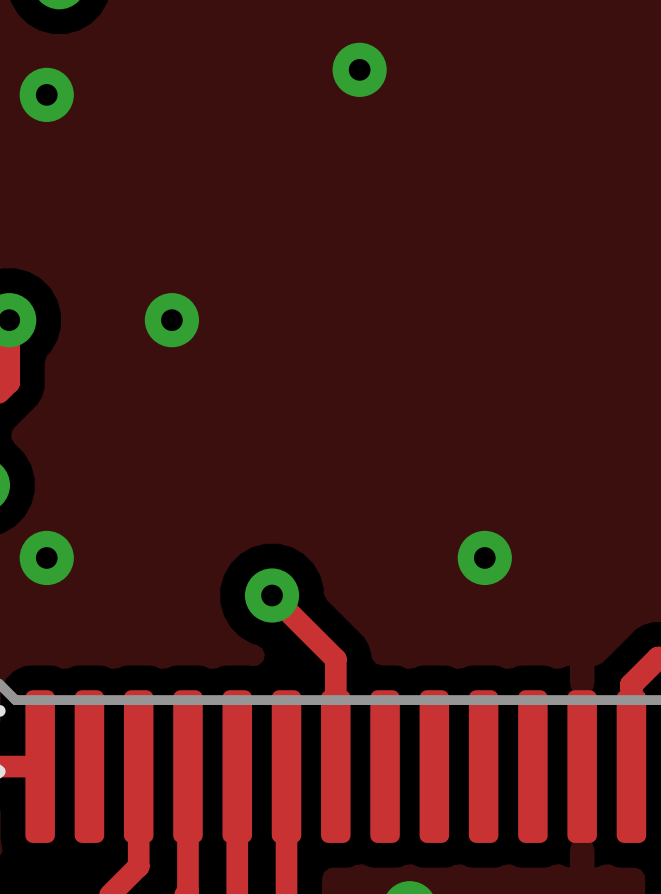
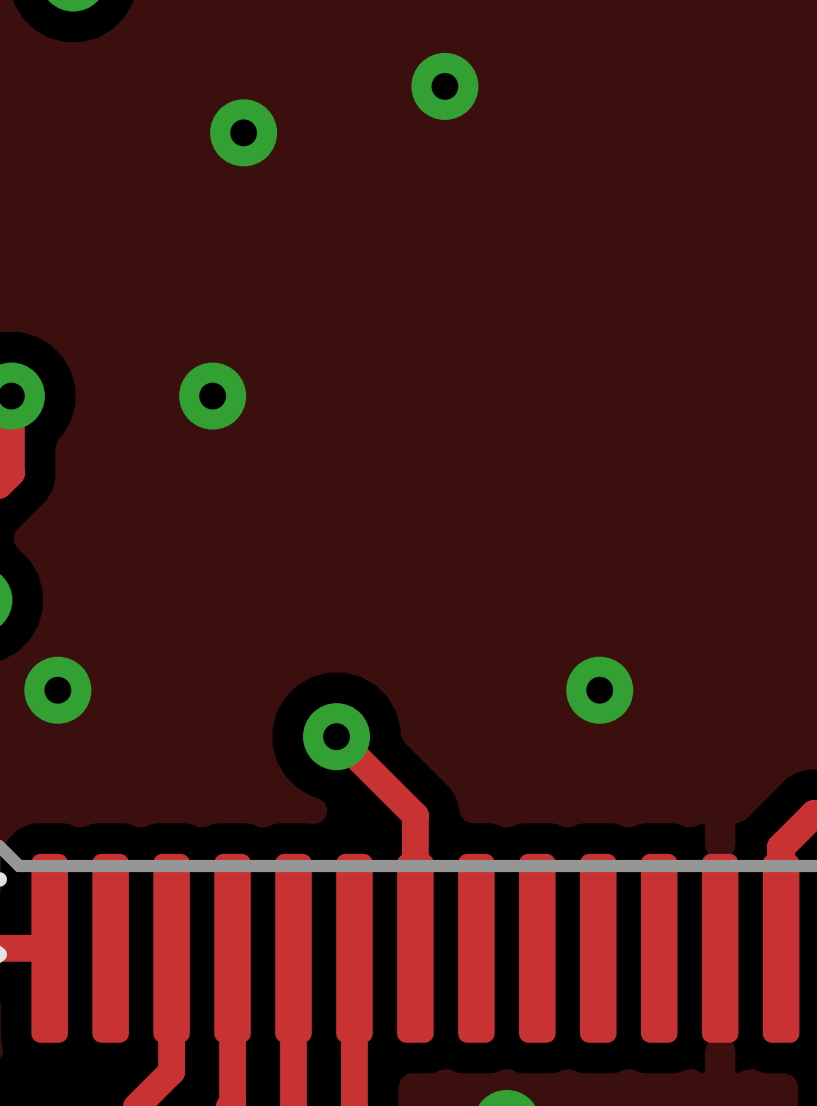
via position: (46, 94) -> (243, 132)

